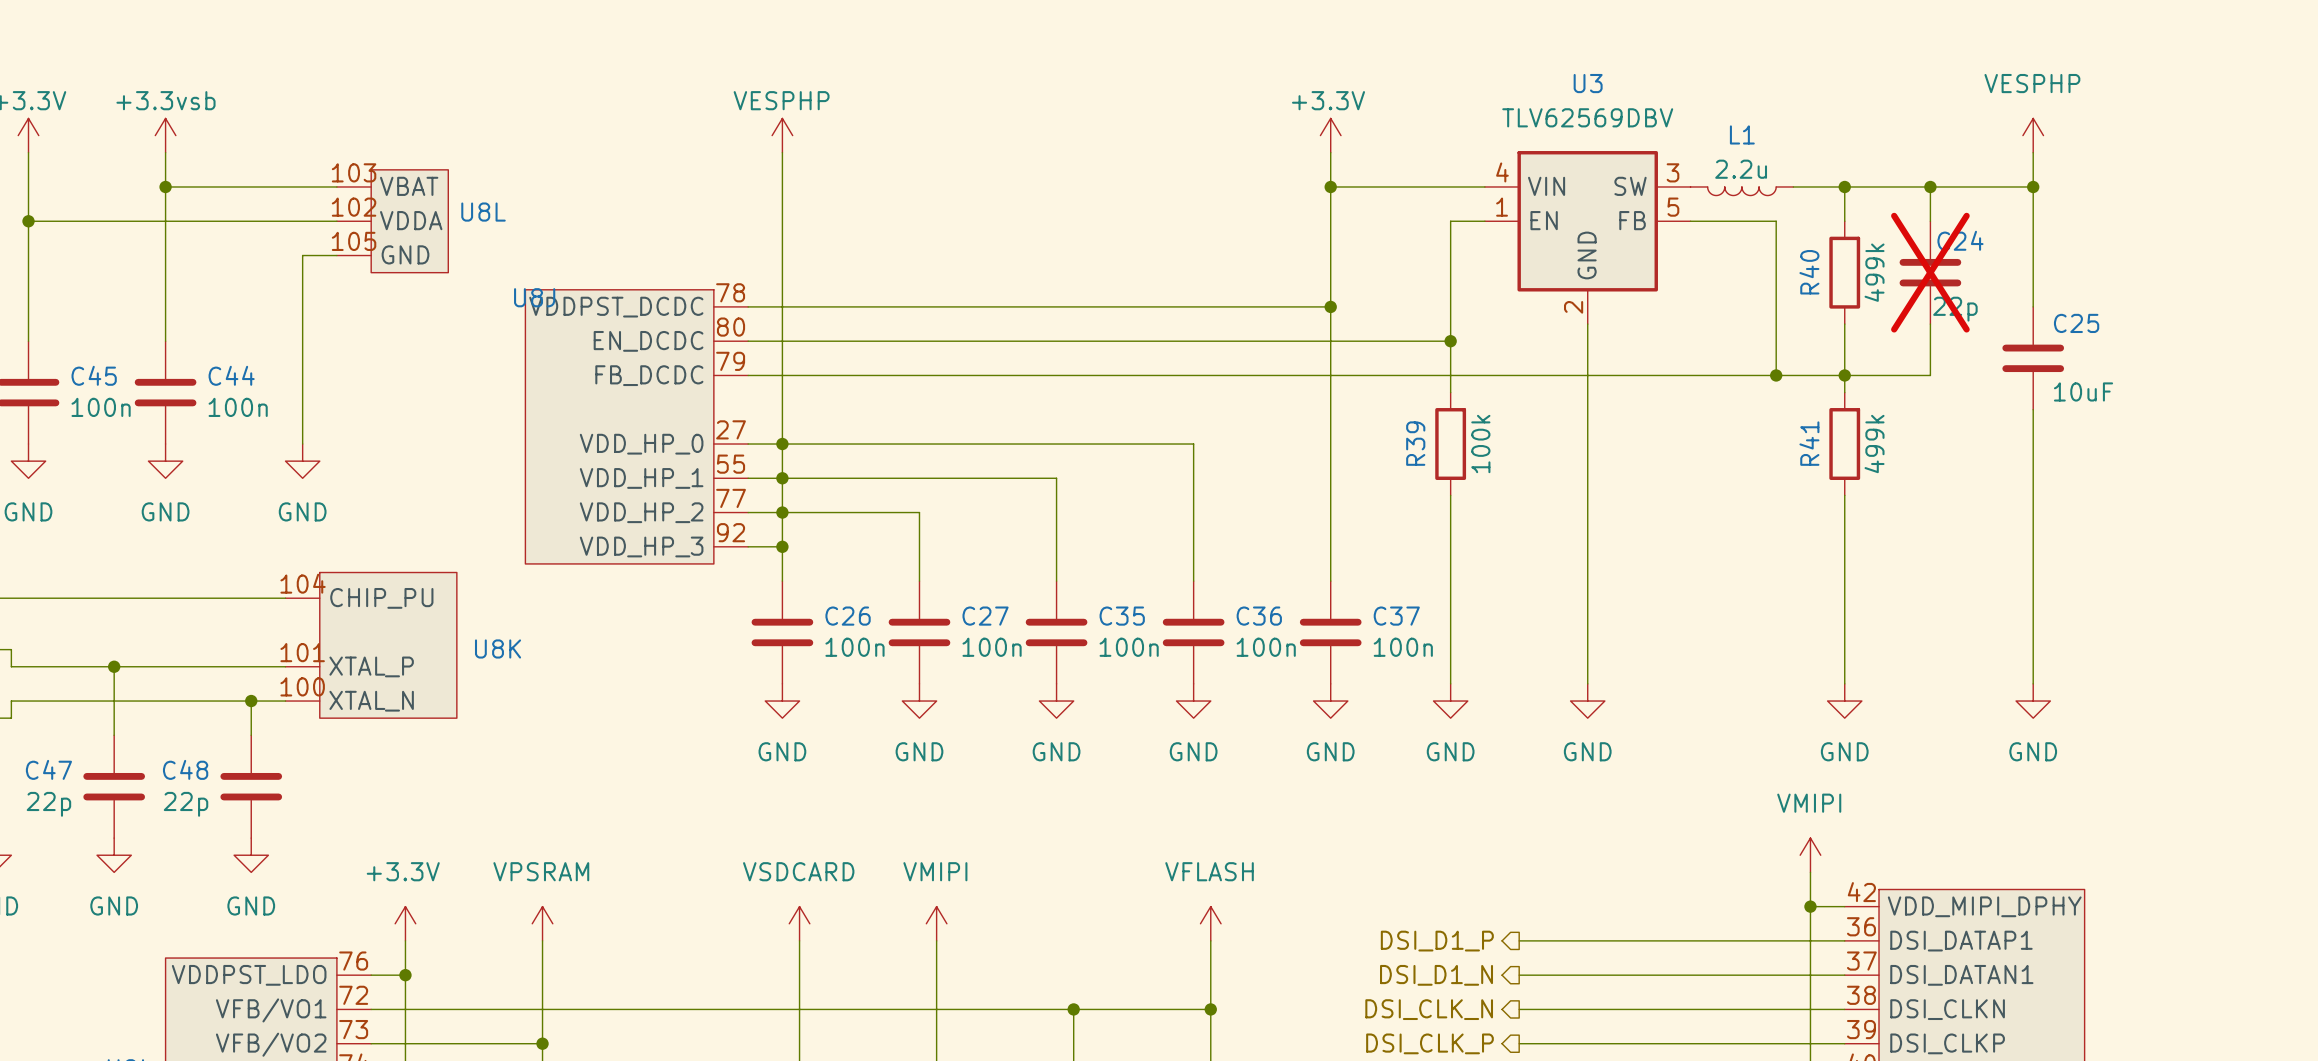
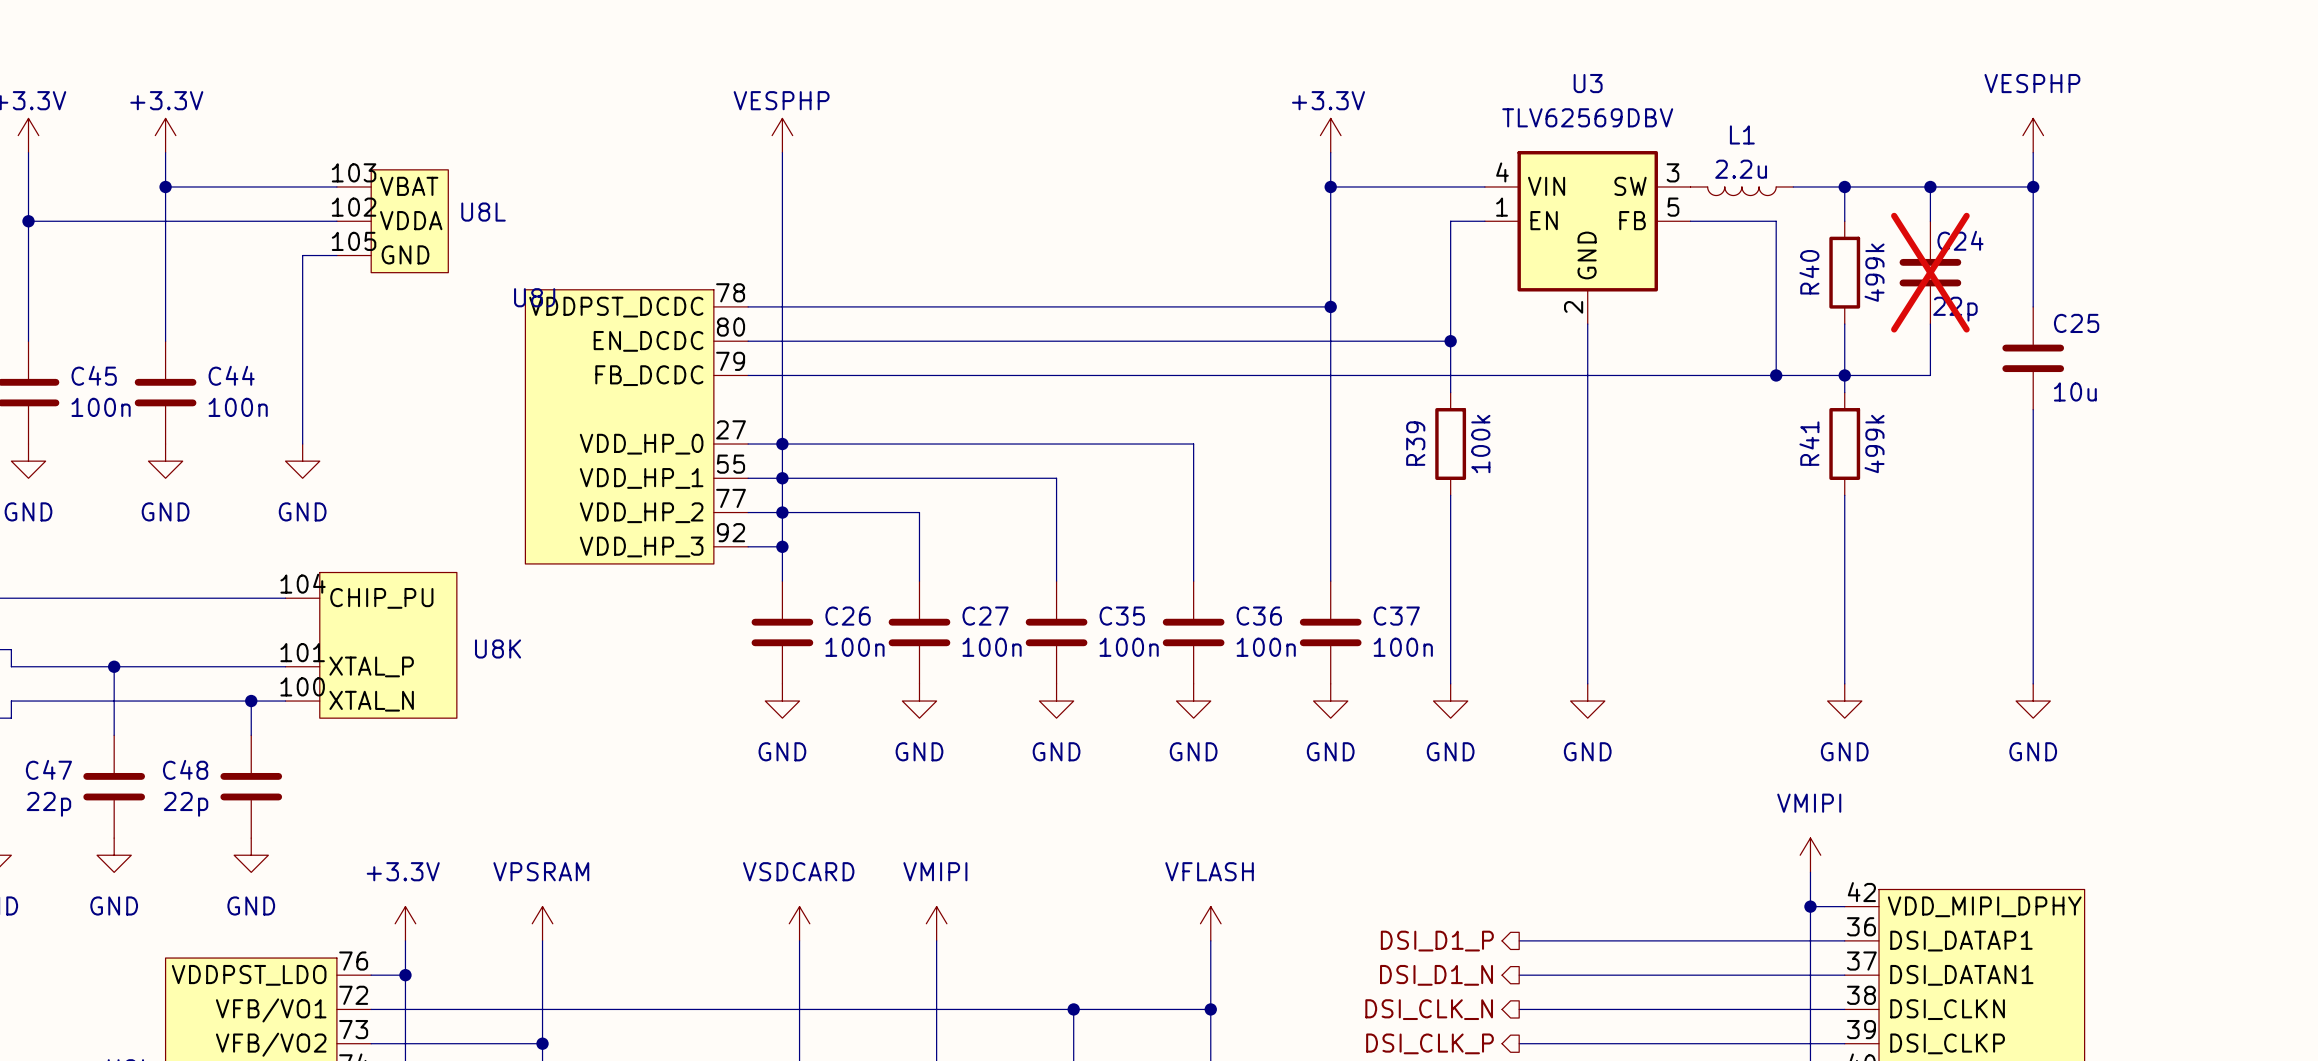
power symbol: +3.3vsb (165, 135) -> +3.3V (165, 135)
C25 value: 10uF (2083, 391) -> 10u (2075, 391)

